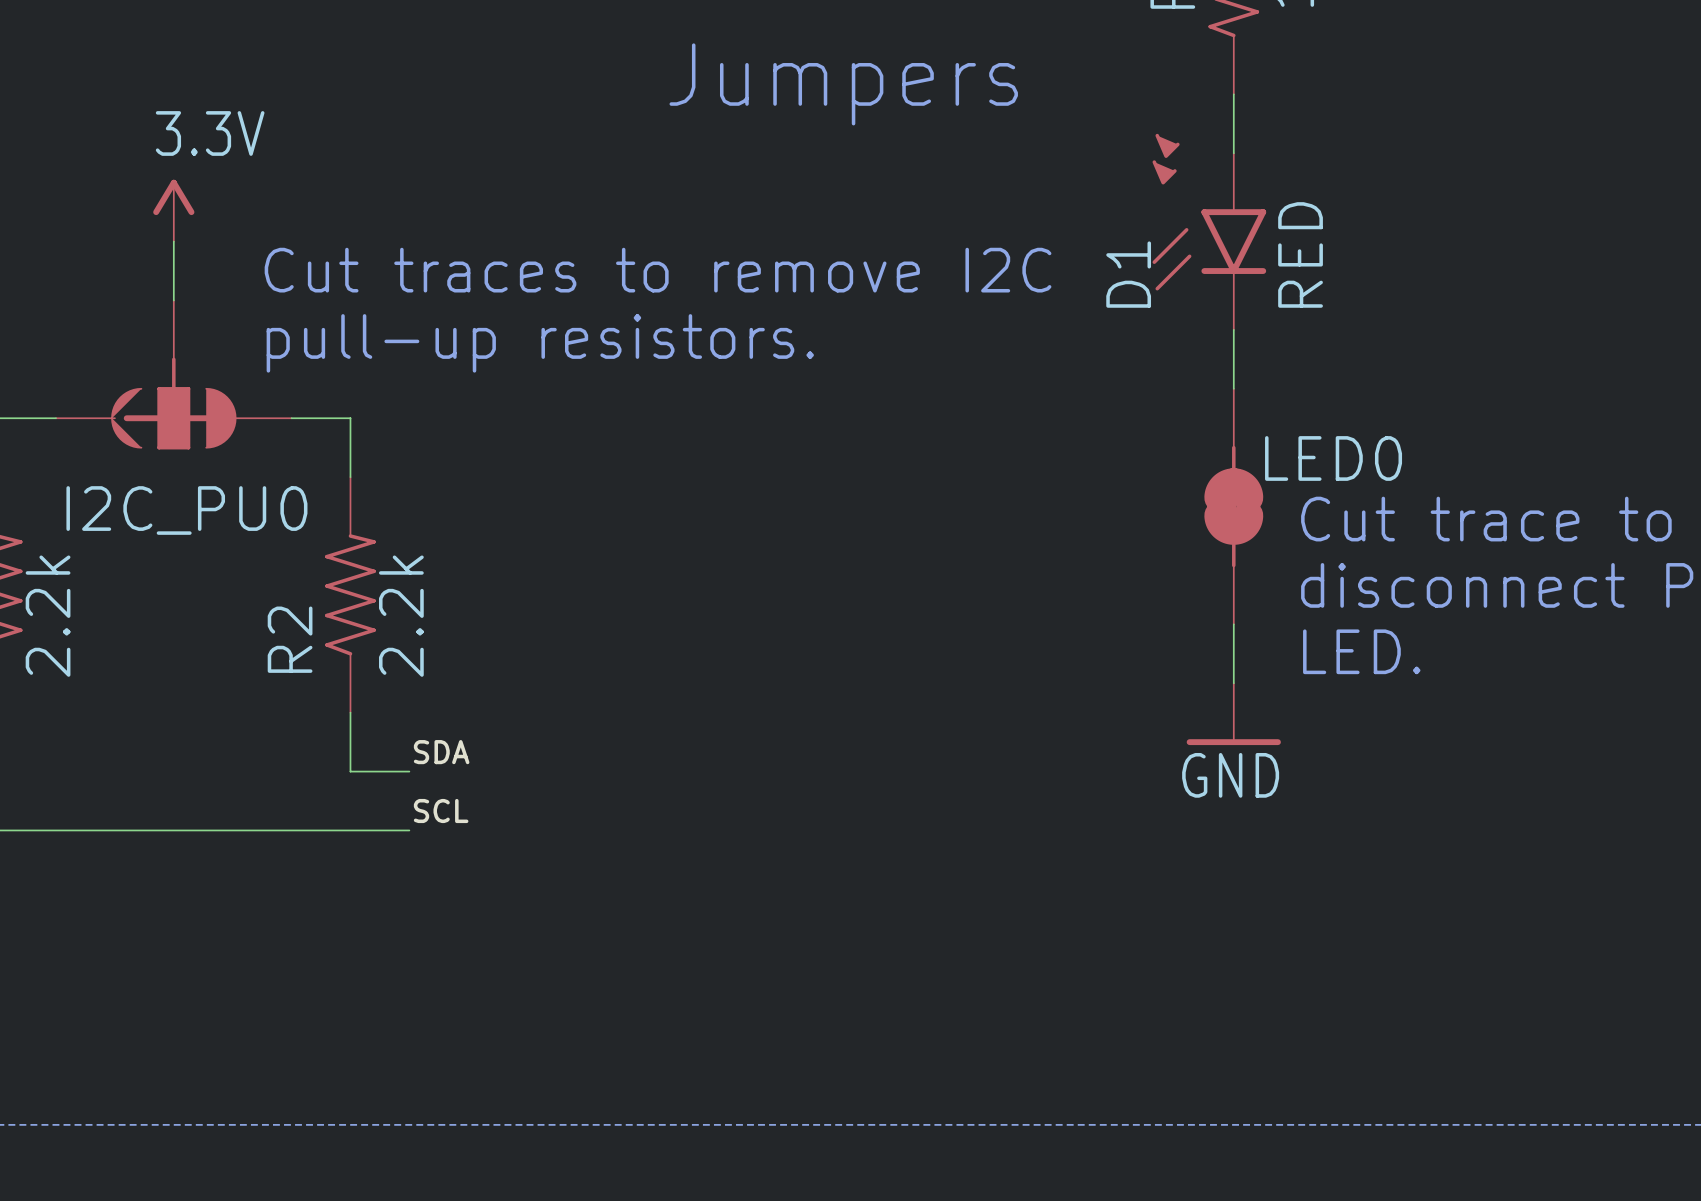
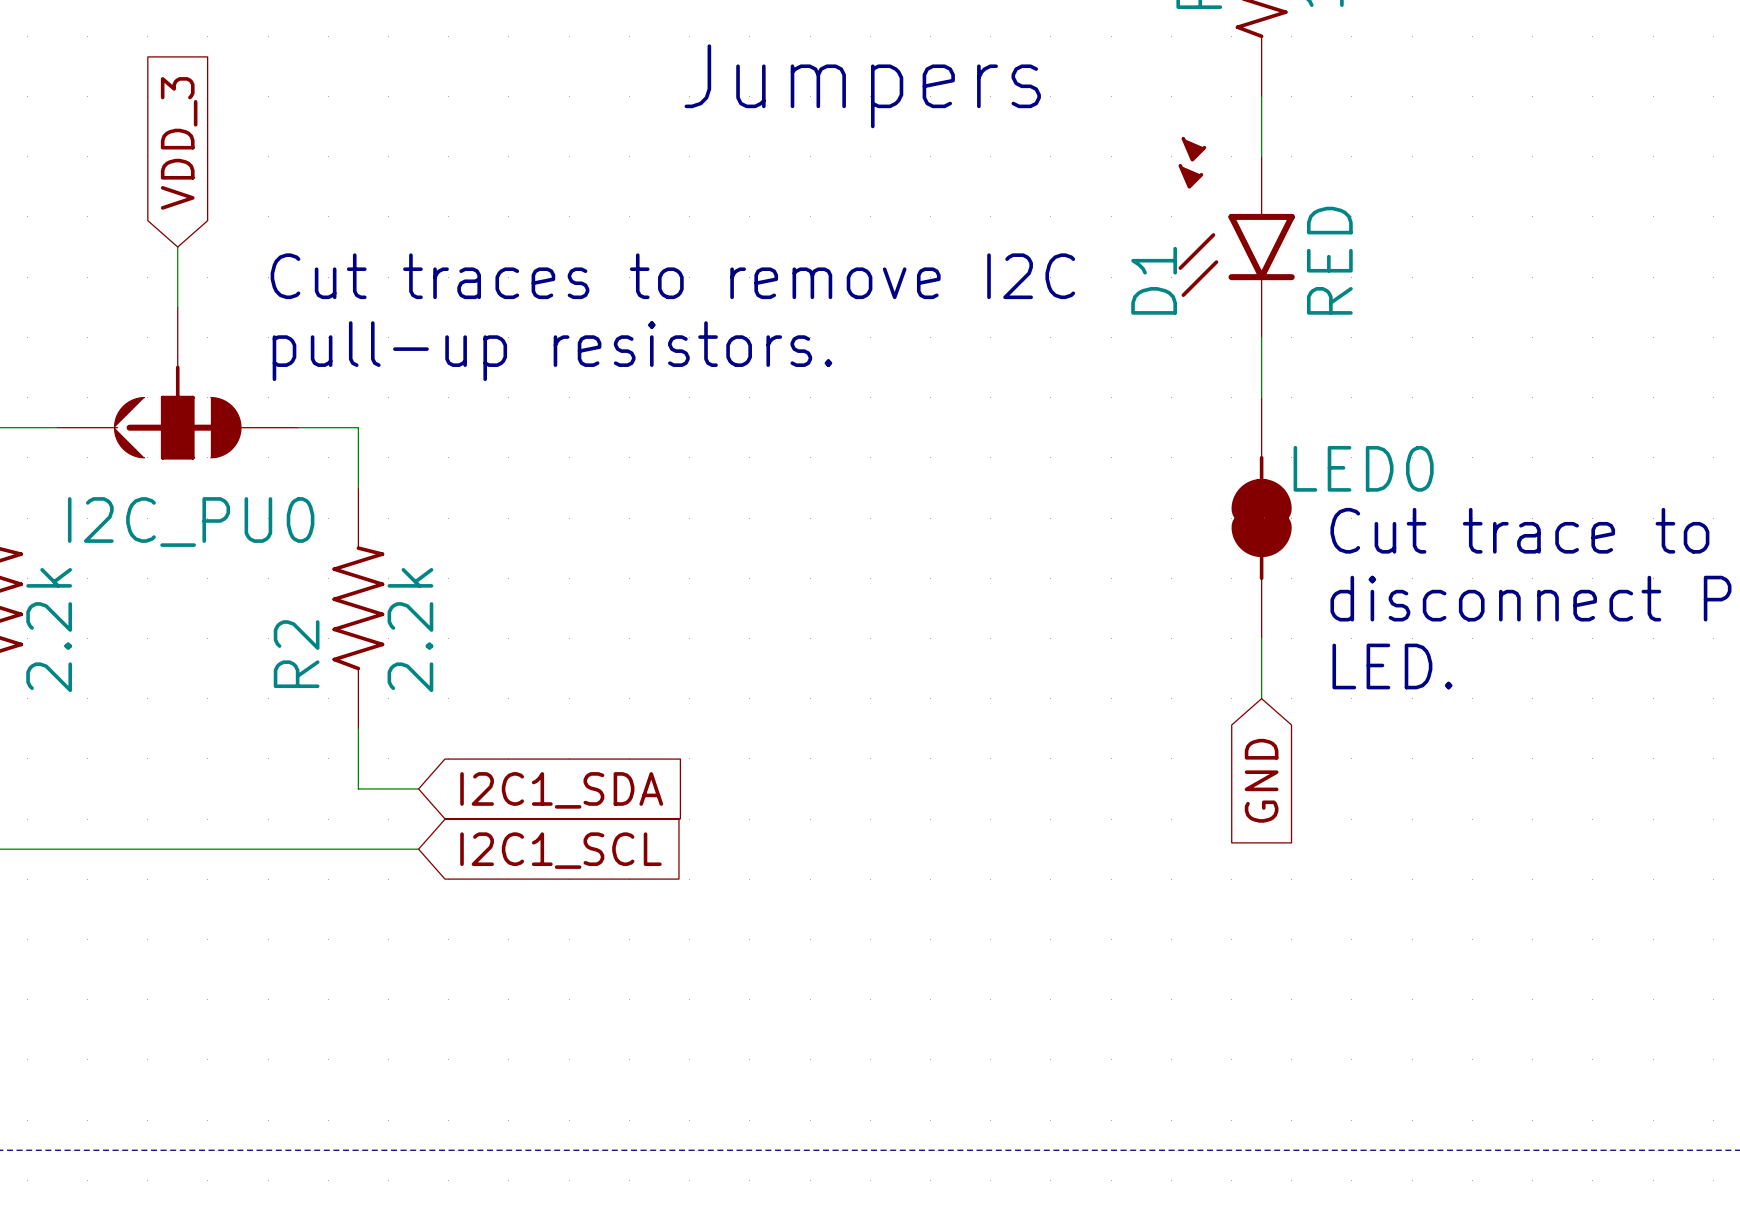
global label: none -> VDD_3 (179, 143)
power symbol: 3.3V (173, 210) -> none
power symbol: GND (1233, 714) -> none
label: SDA (441, 752) -> none
global label: none -> GND (1261, 780)
global label: none -> I2C1_SDA (561, 790)
label: SCL (441, 811) -> none
global label: none -> I2C1_SCL (560, 850)

